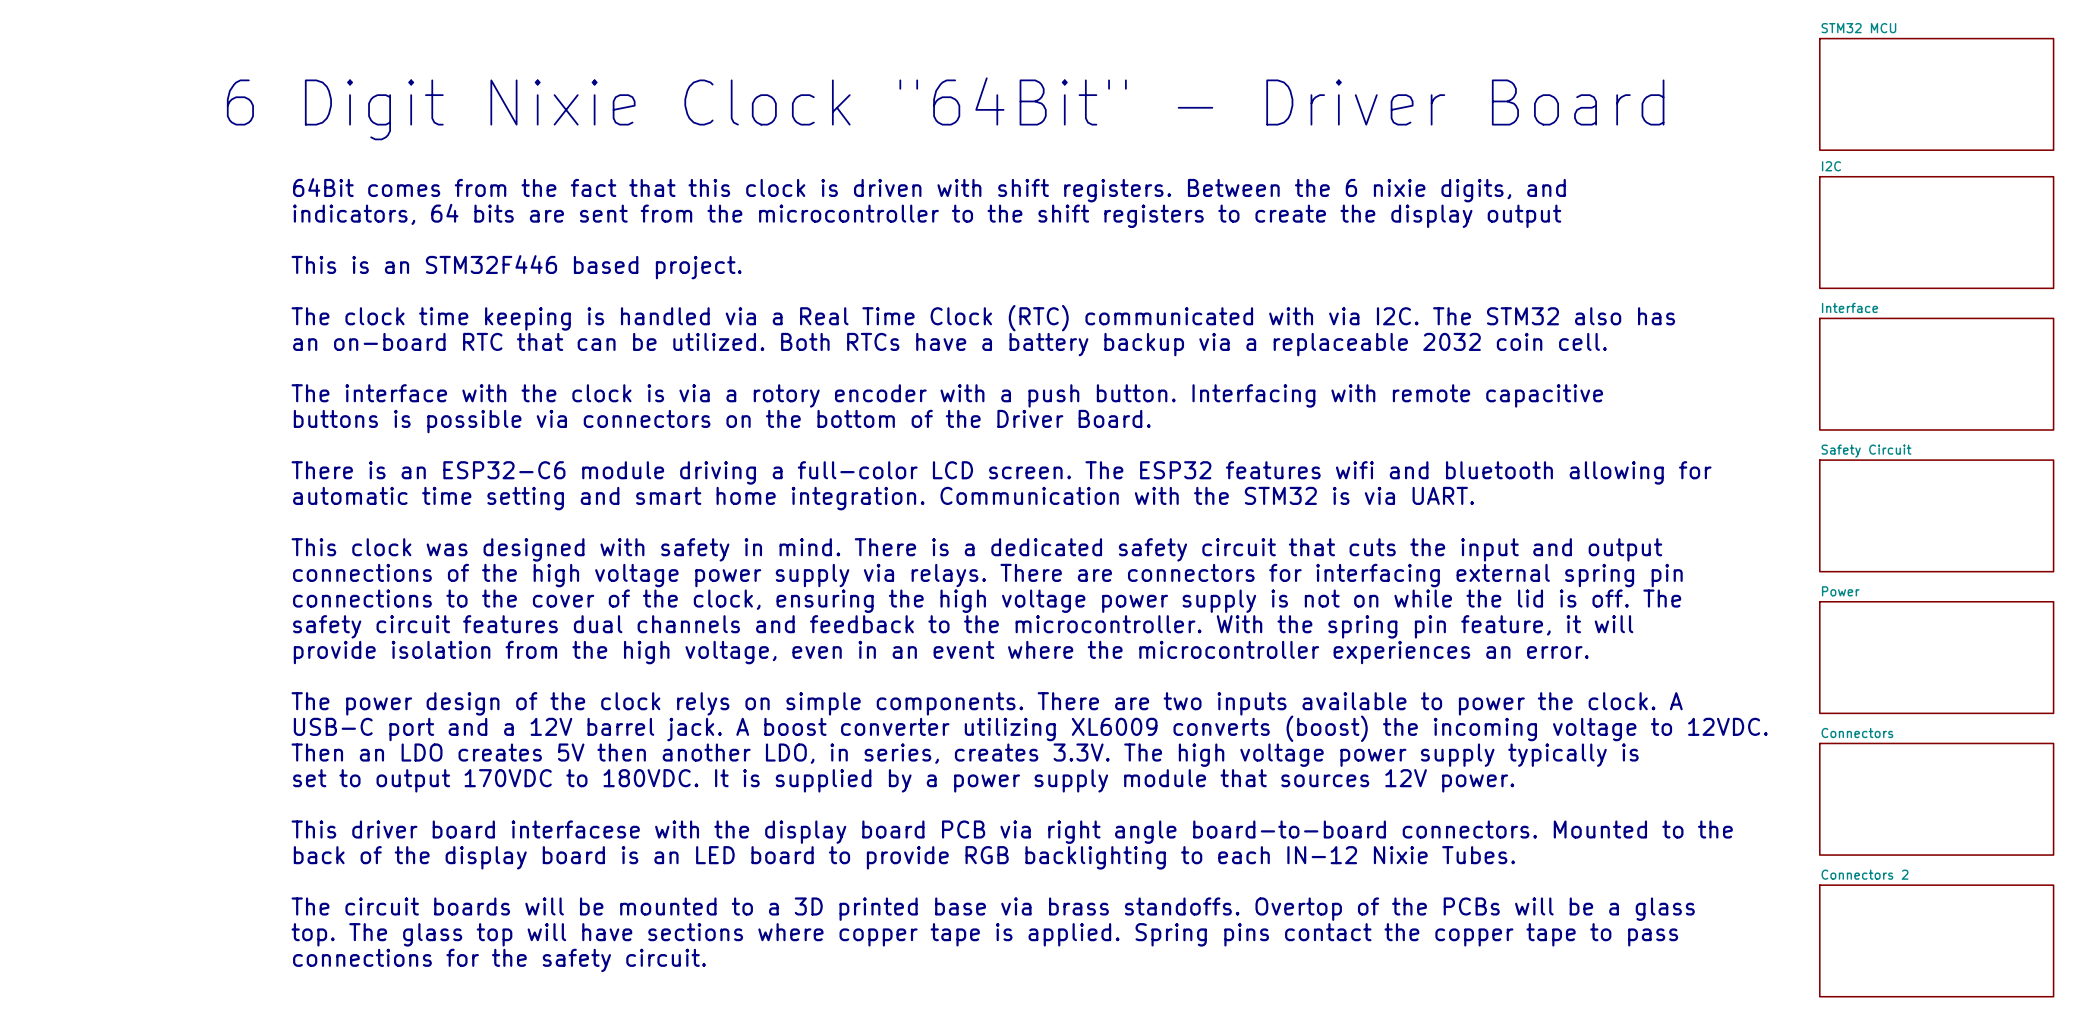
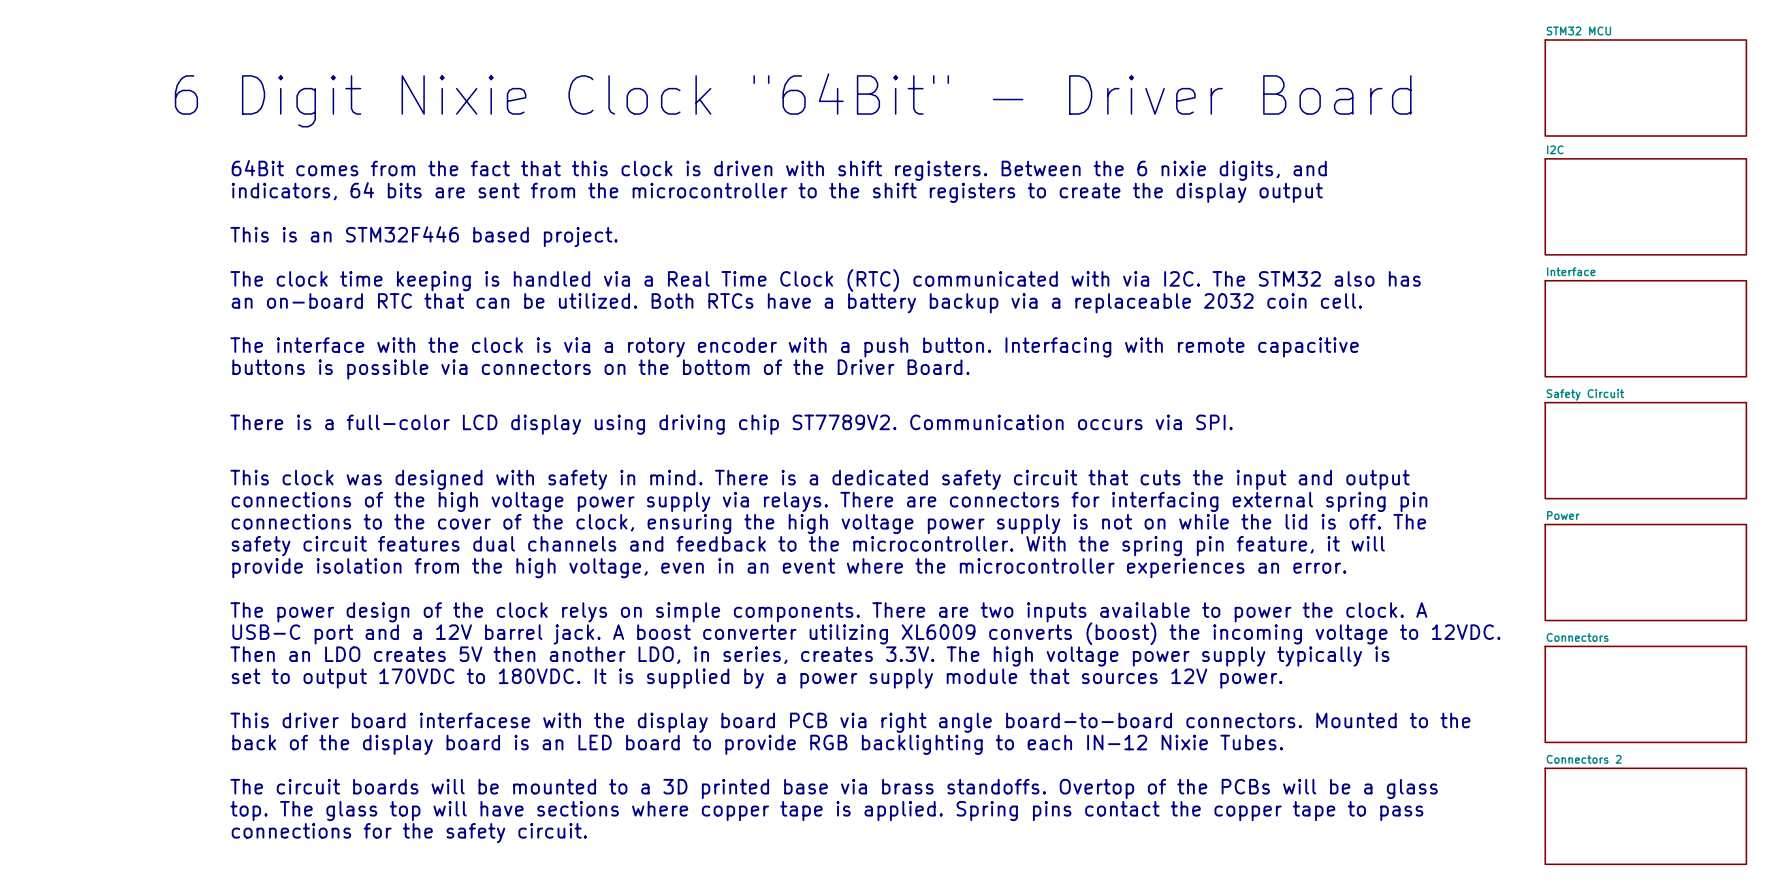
text: There is an ESP32-C6 module driving a full-color LCD screen. The ESP32 features wifi and bluetooth allowing for (1001, 472) -> none
text: none -> There is a full-color LCD display using driving chip ST7789V2. Communication occurs via SPI. (731, 424)
text: automatic time setting and smart home integration. Communication with the STM32 is via UART. (883, 498) -> none

